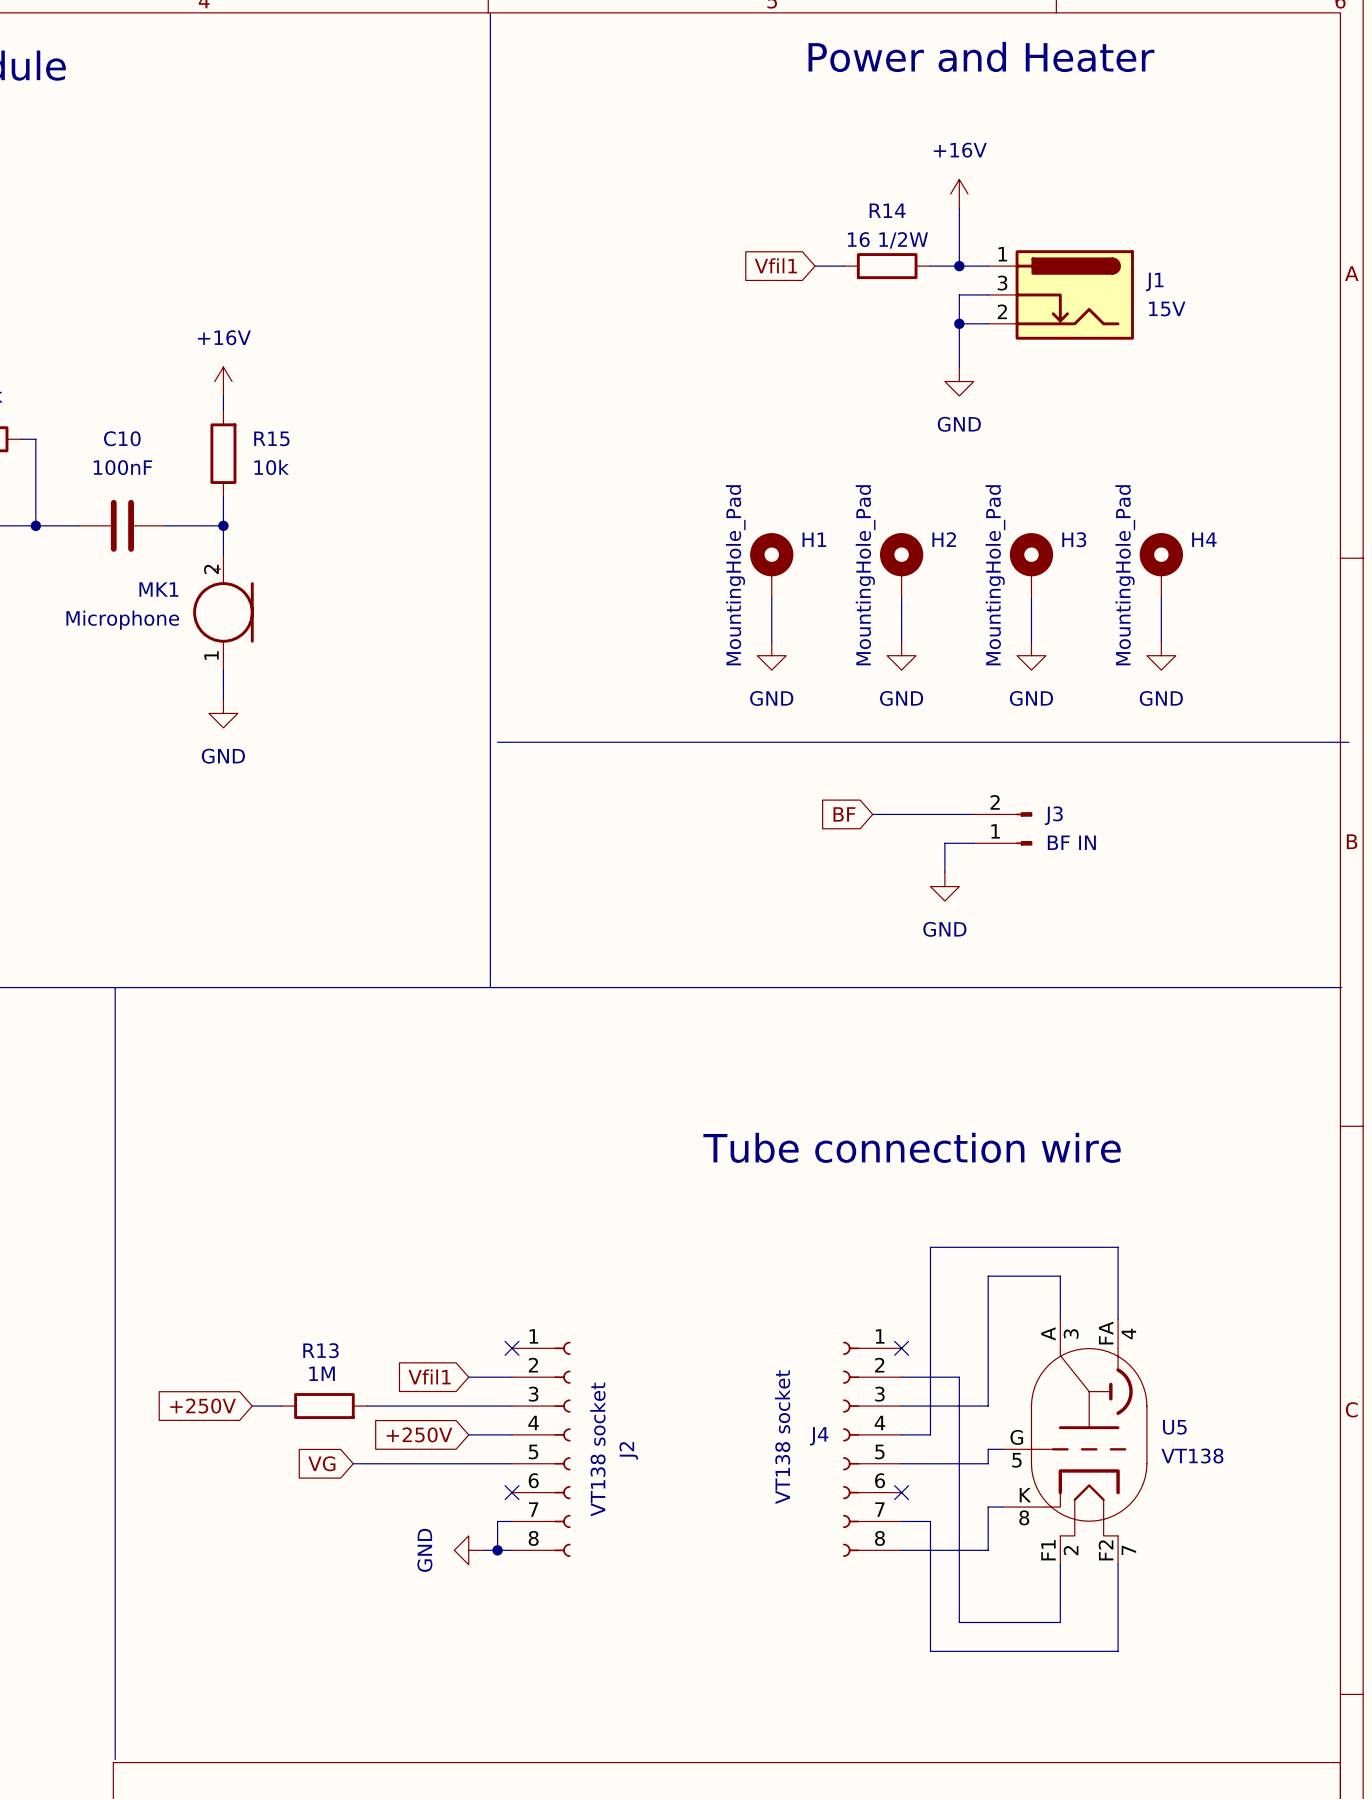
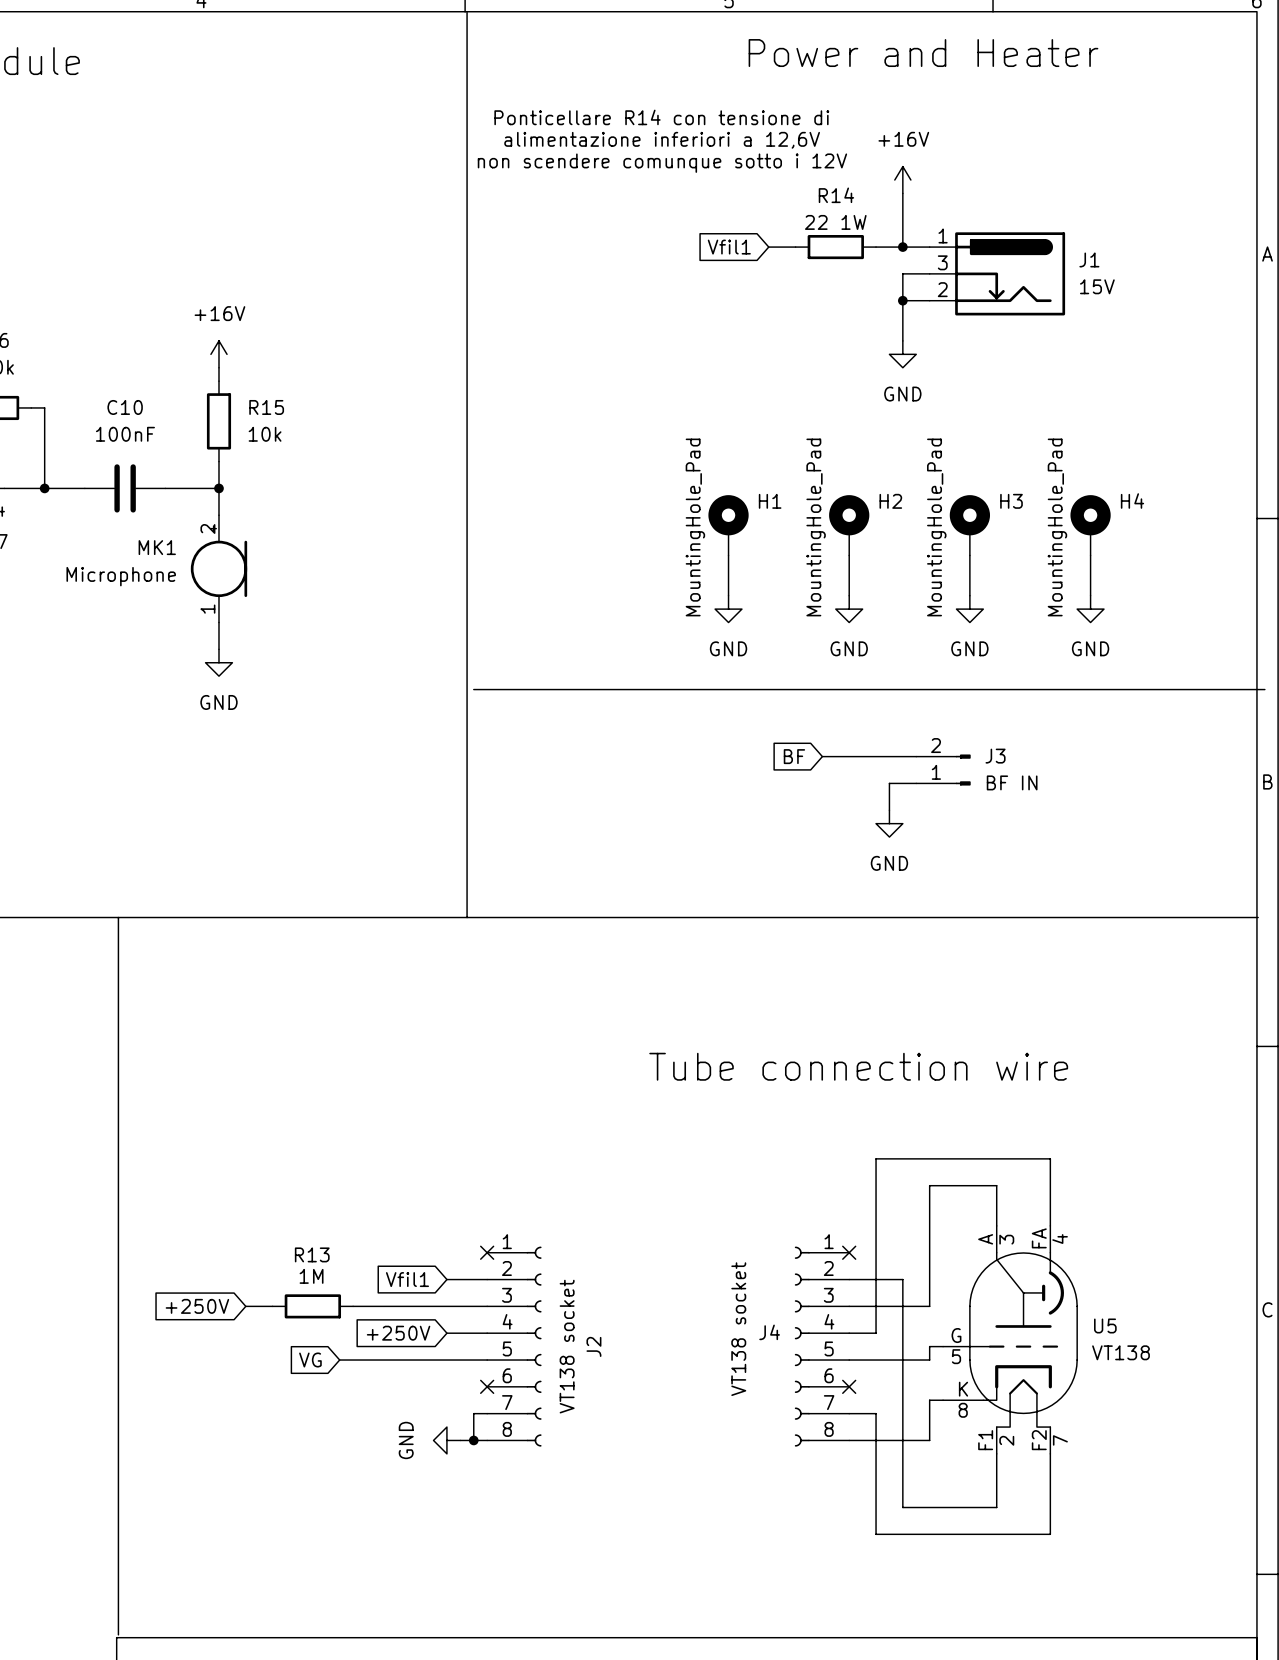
text: none -> Ponticellare R14 con tensione di (661, 117)
text: none -> alimentazione inferiori a 12,6V (662, 140)
text: none -> non scendere comunque sotto i 12V (662, 163)
R14 value: 16 1/2W (887, 240) -> 22 1W (835, 222)

